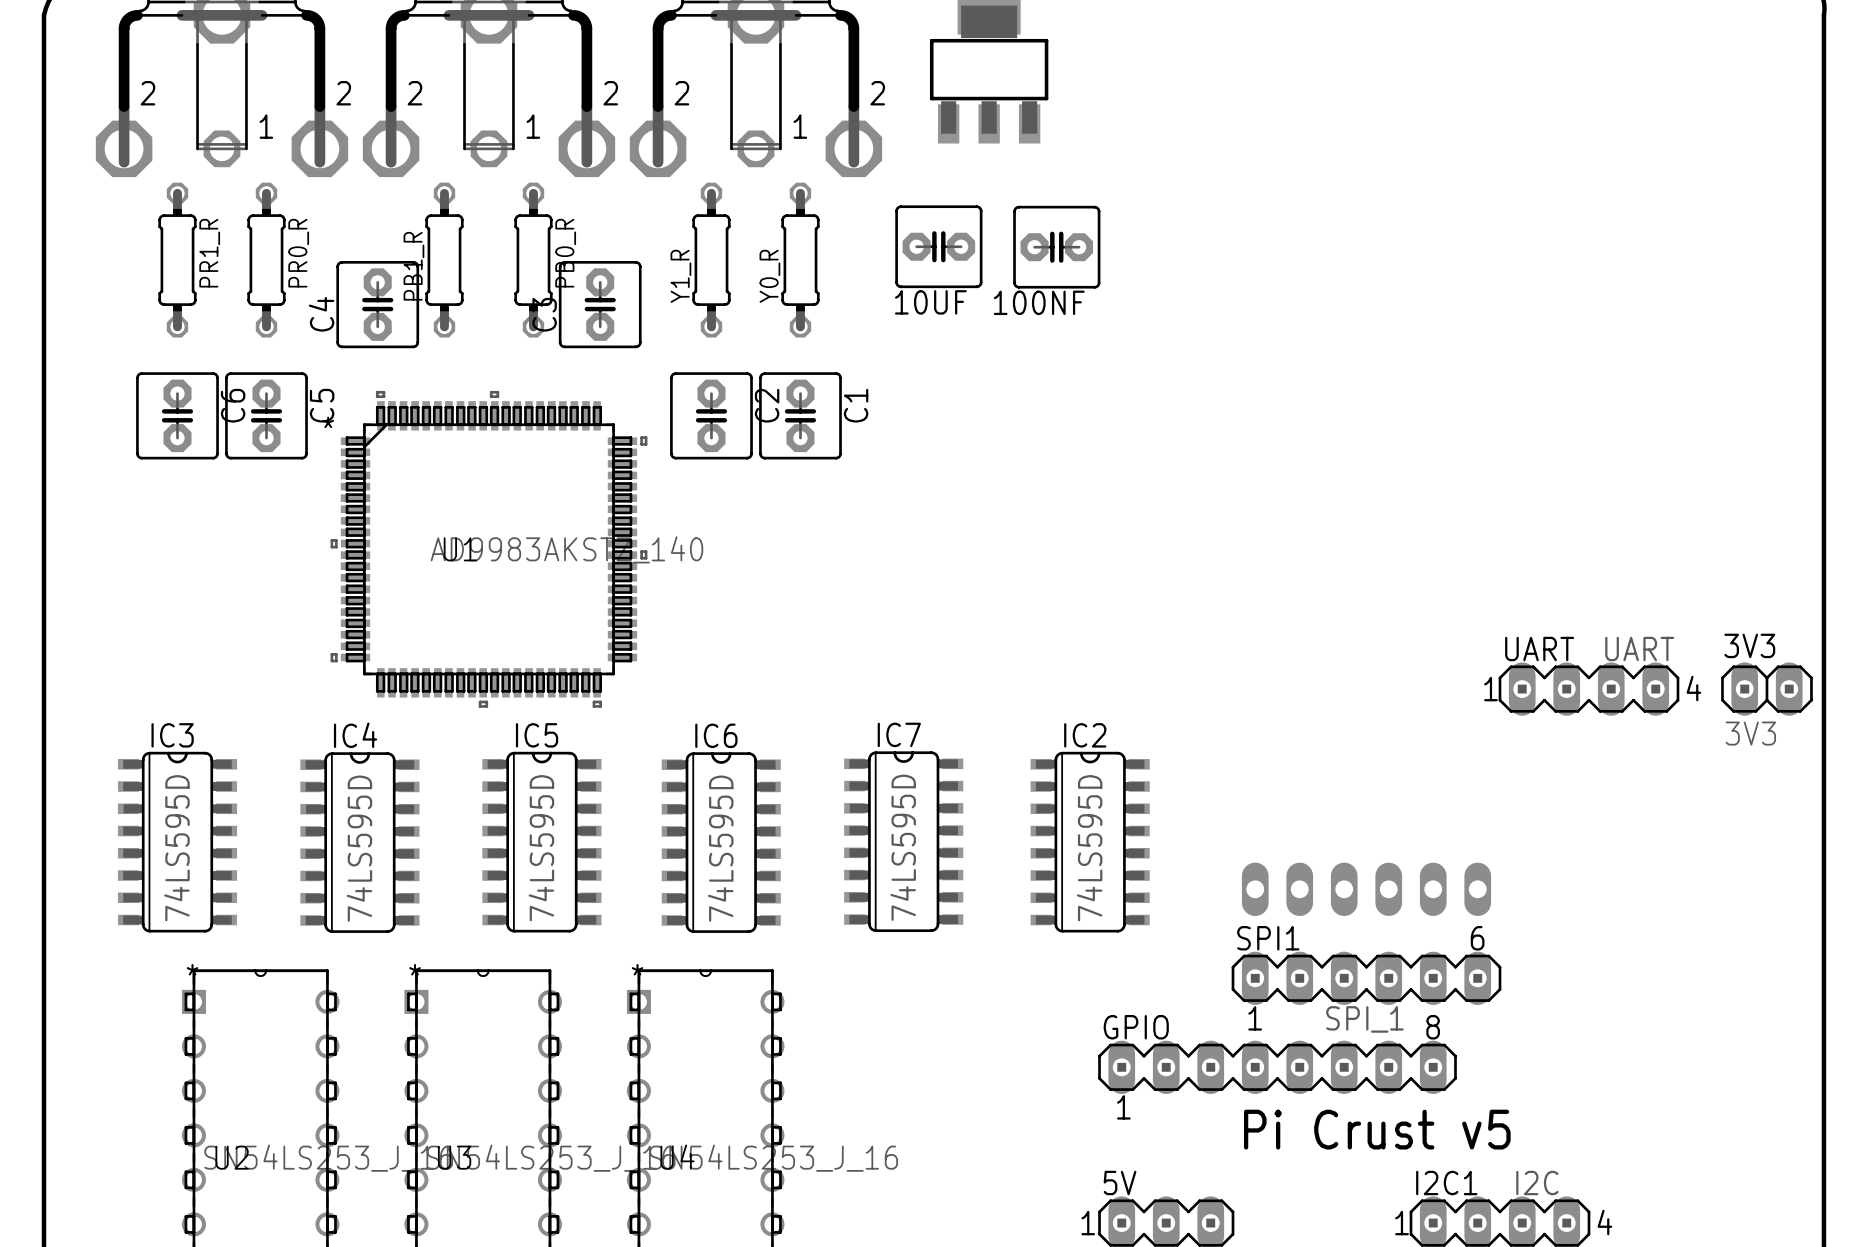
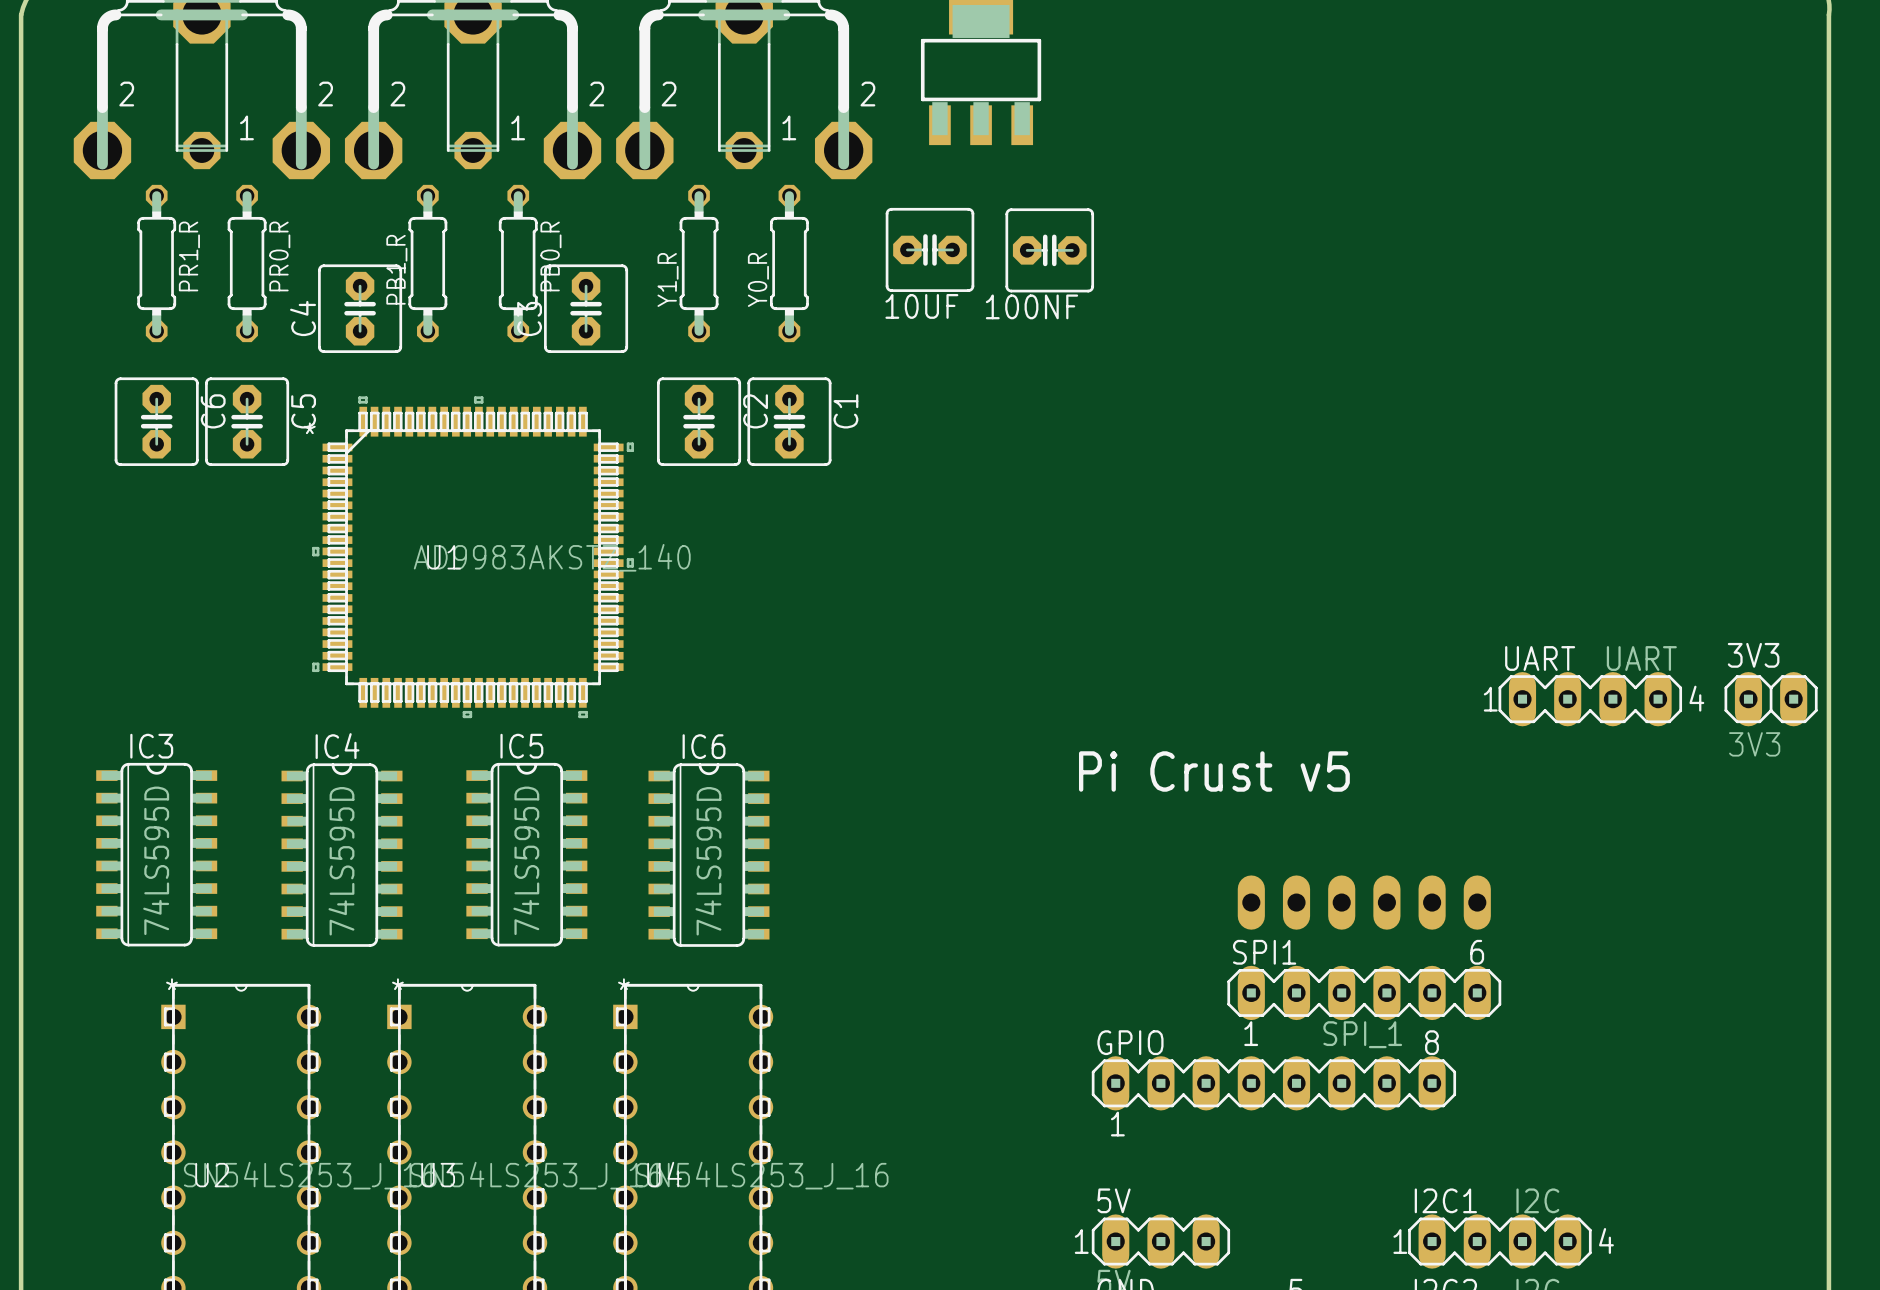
IC7: 74LS595D (903, 841) -> none
IC2: 74LS595D (1090, 842) -> none
text position: Pi Crust v5 (1377, 1129) -> Pi Crust v5 (1214, 771)

